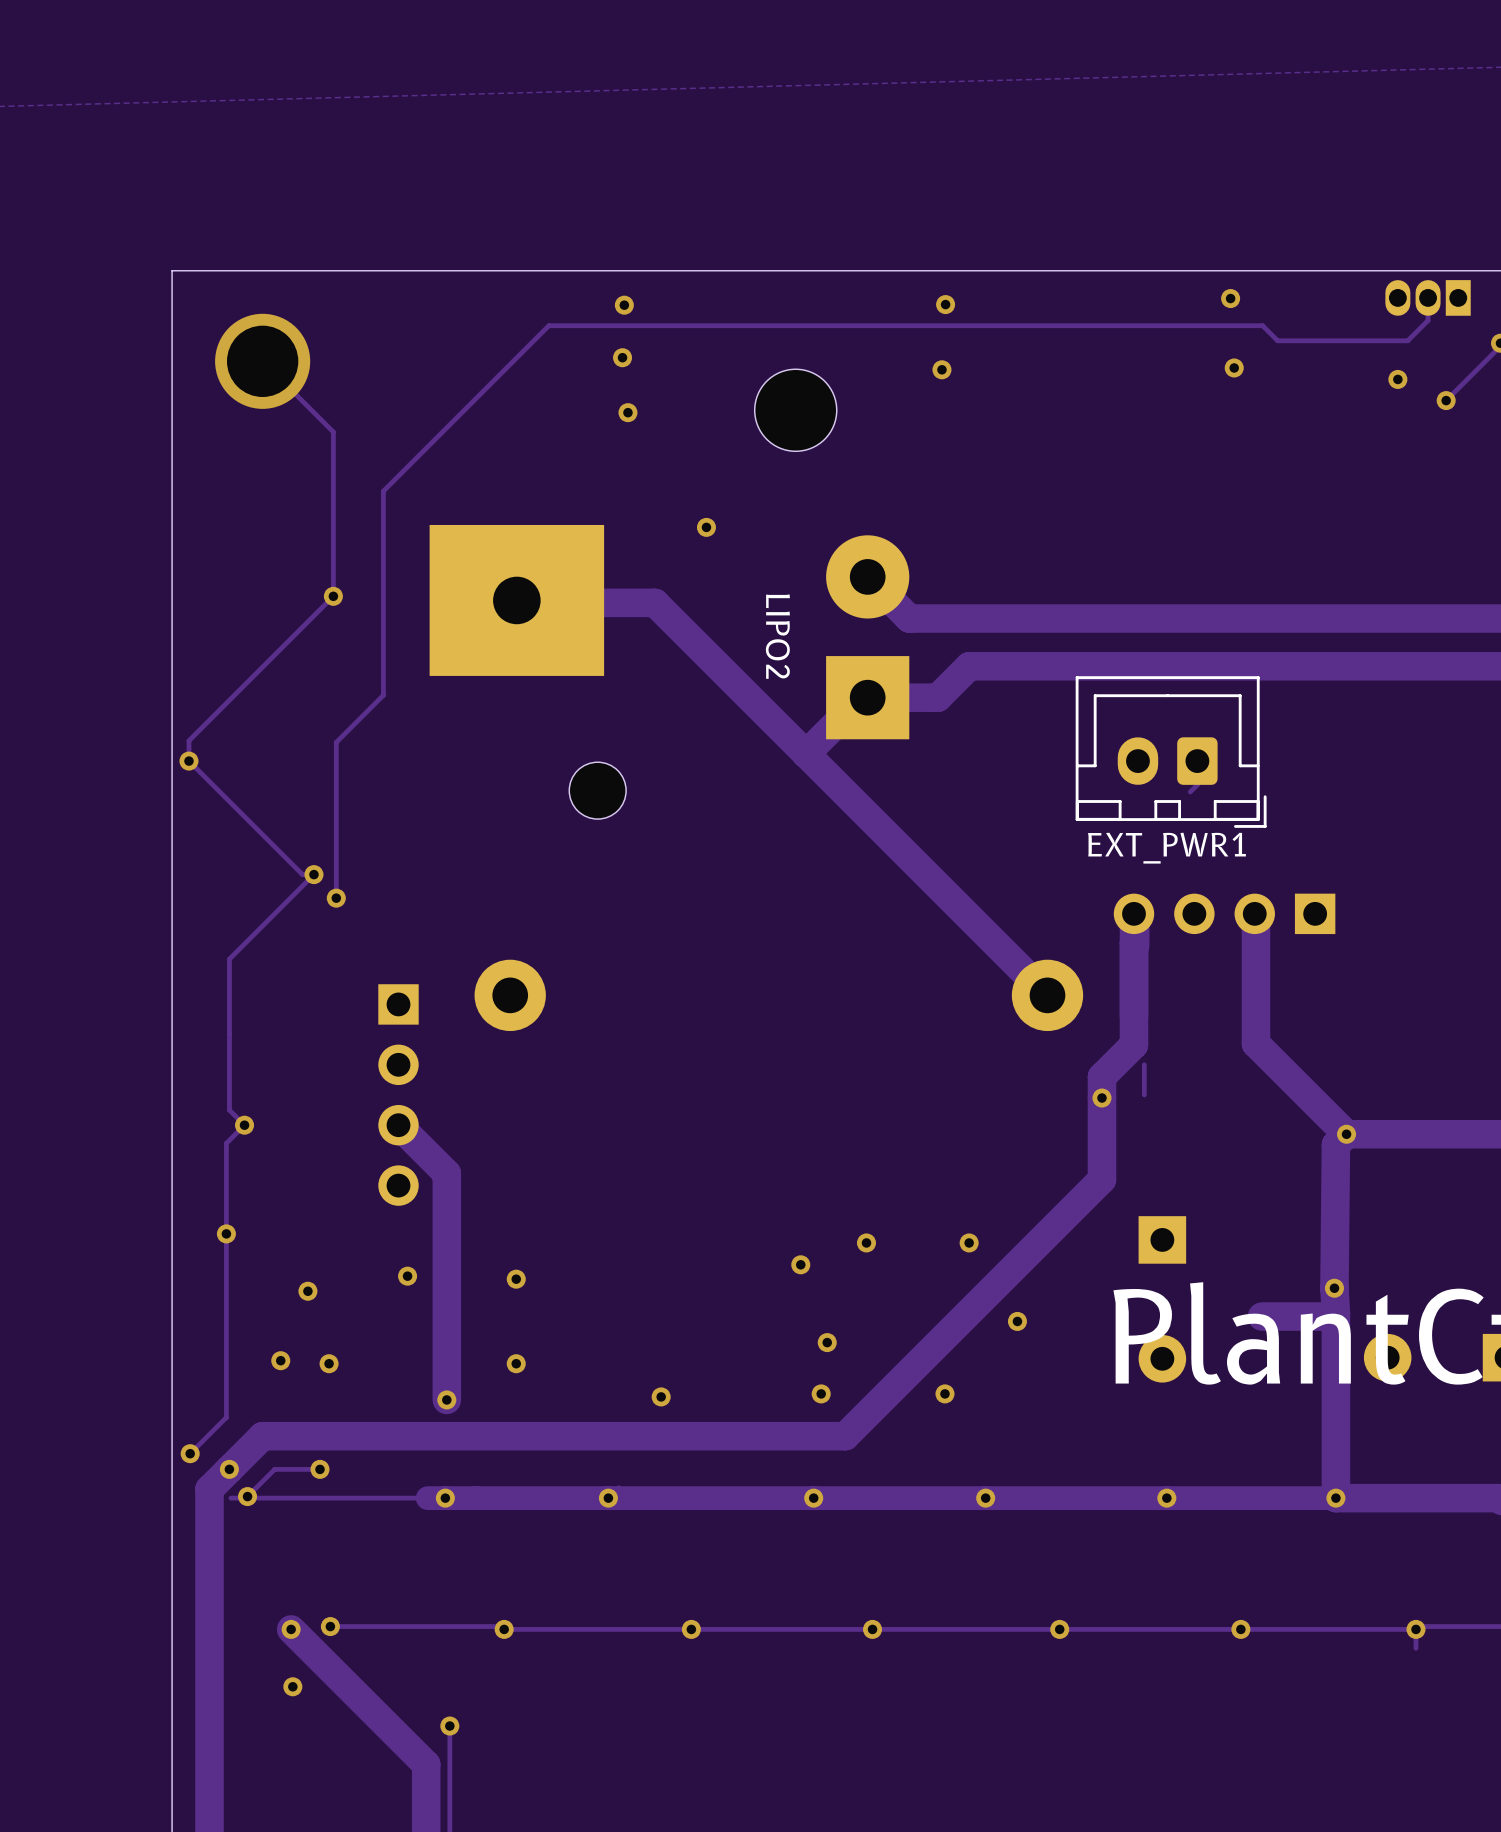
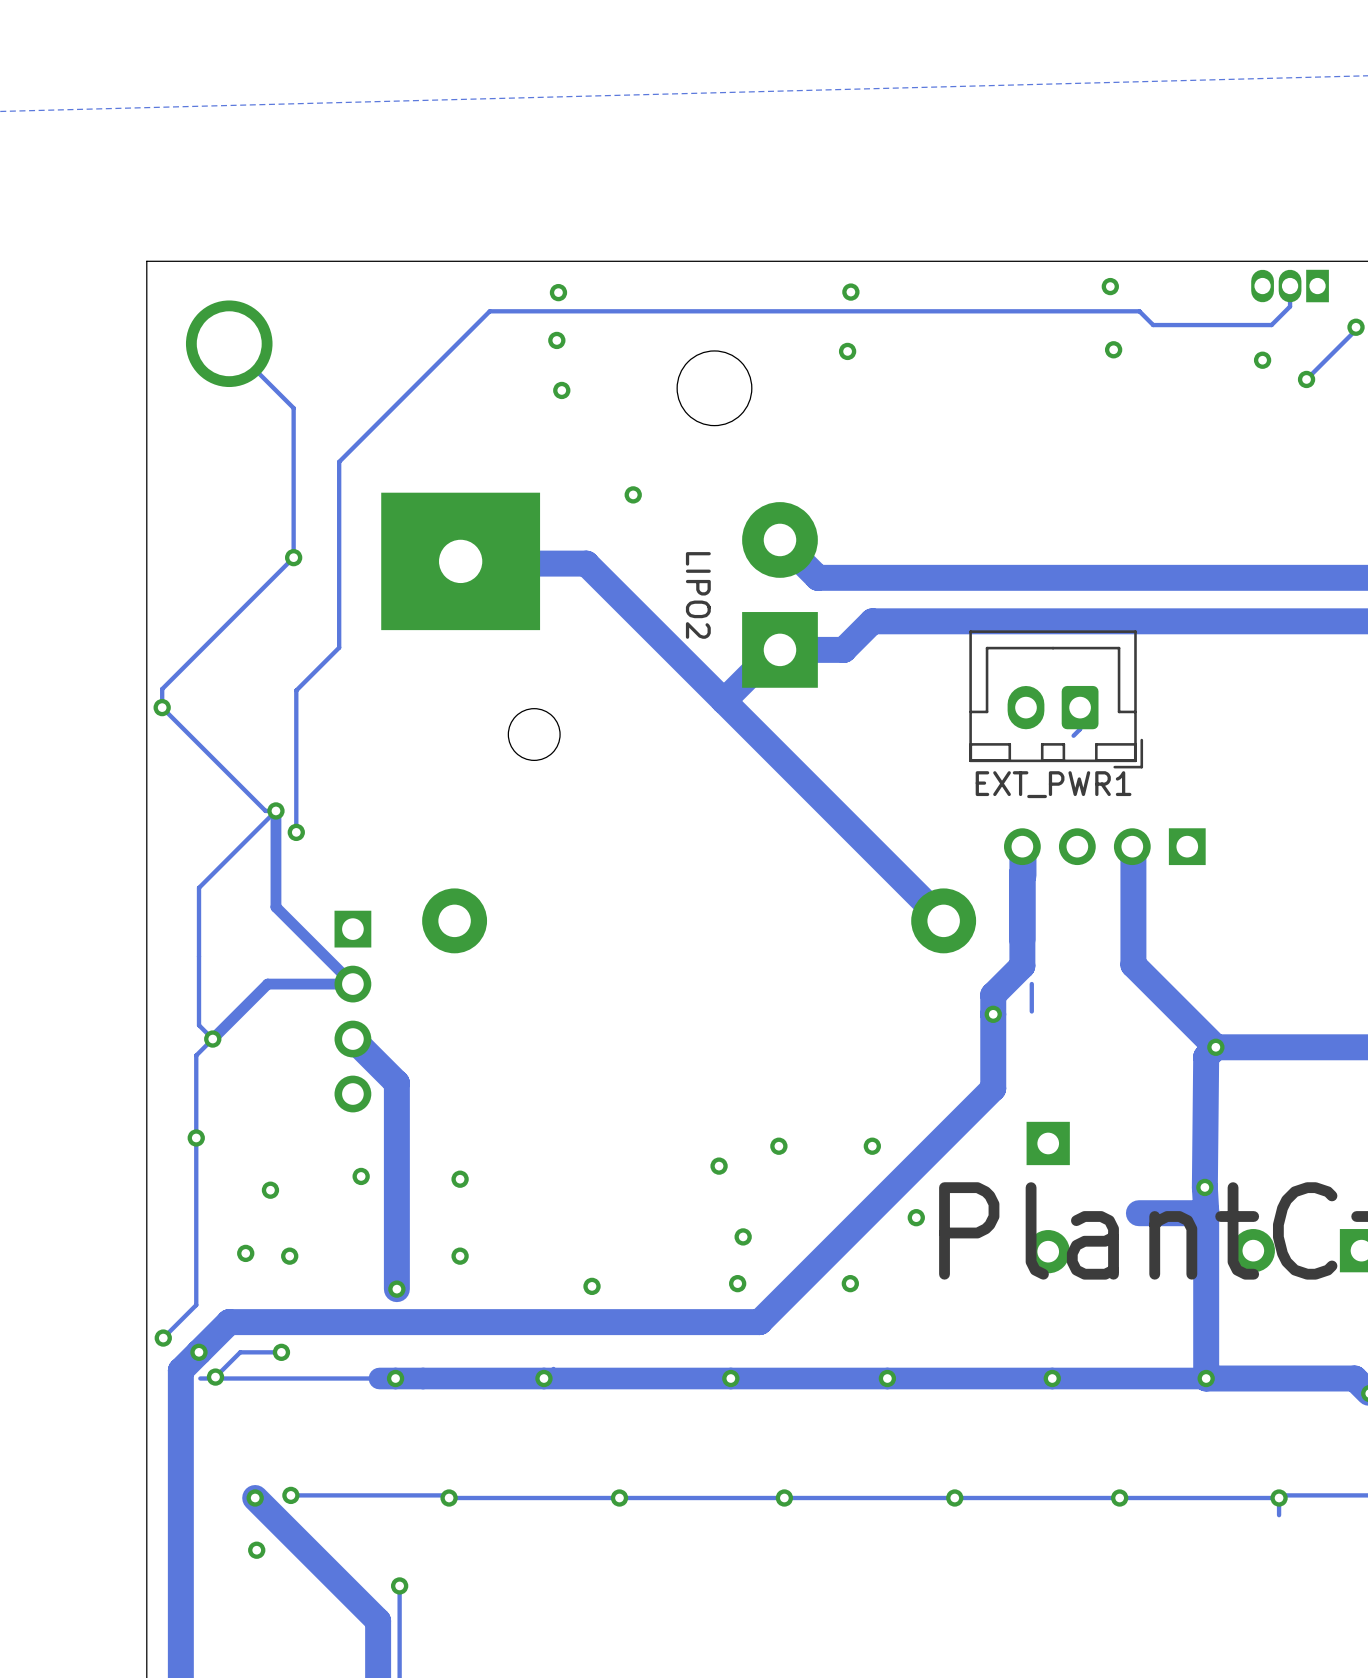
track: none -> (275, 810) (275, 907) (352, 984) (267, 984) (212, 1039)

